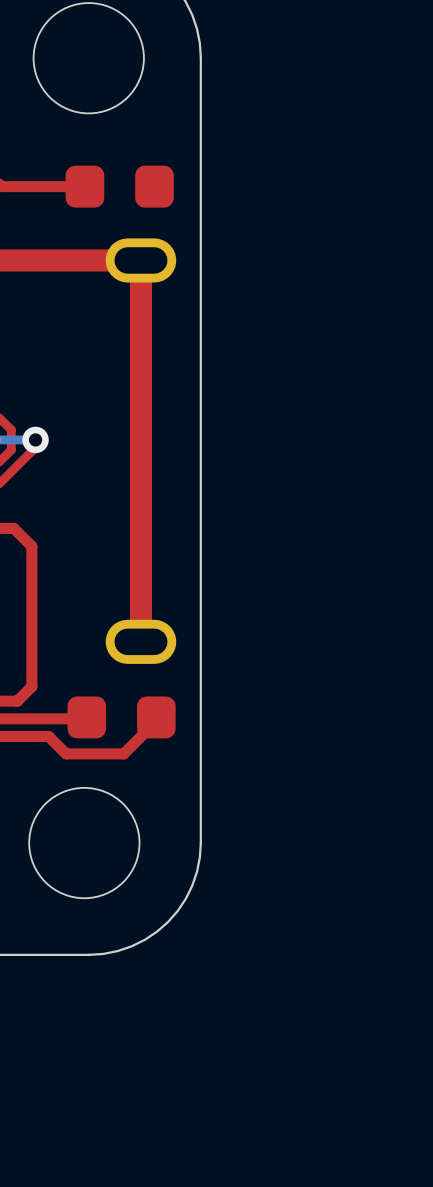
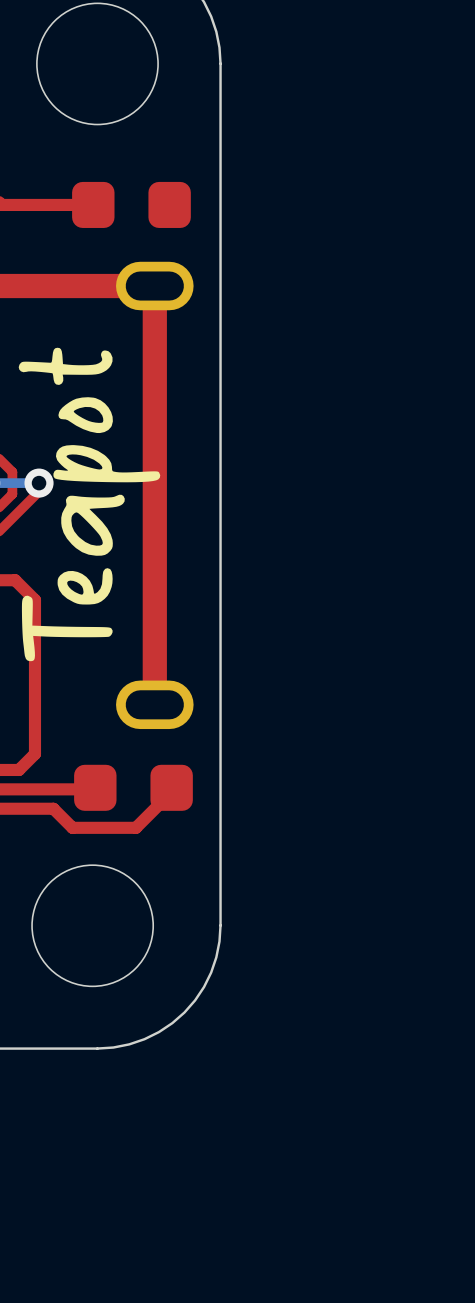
drawing: none -> [18, 347, 161, 662]

